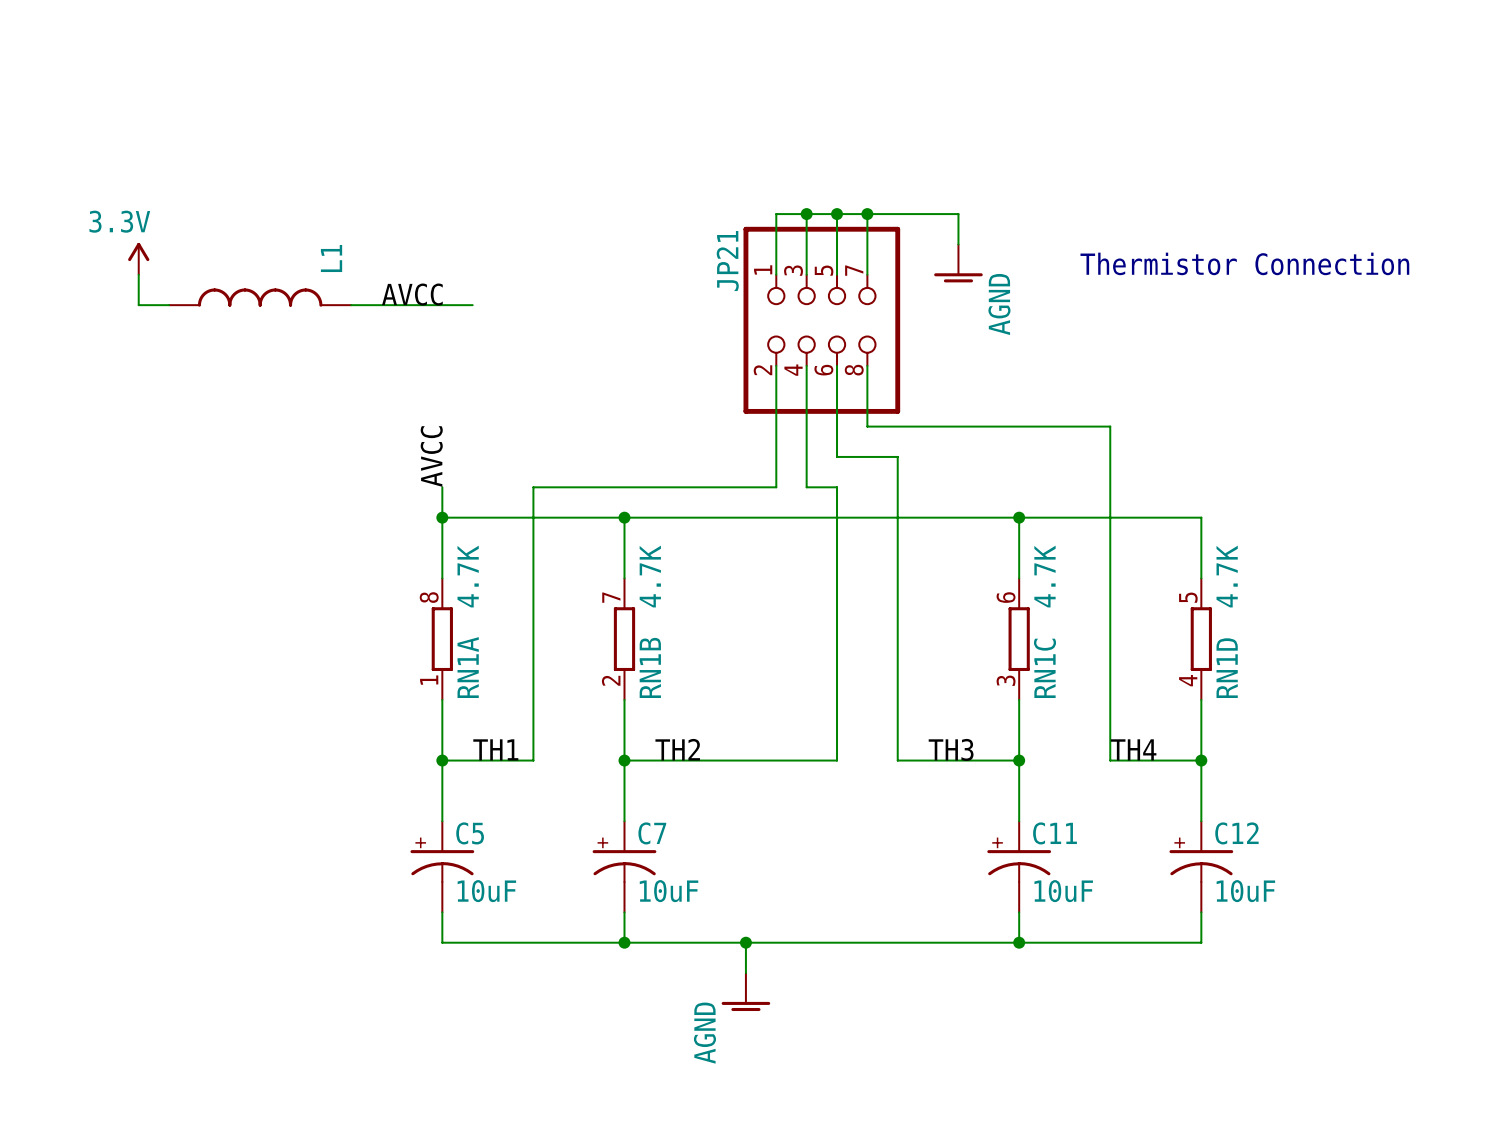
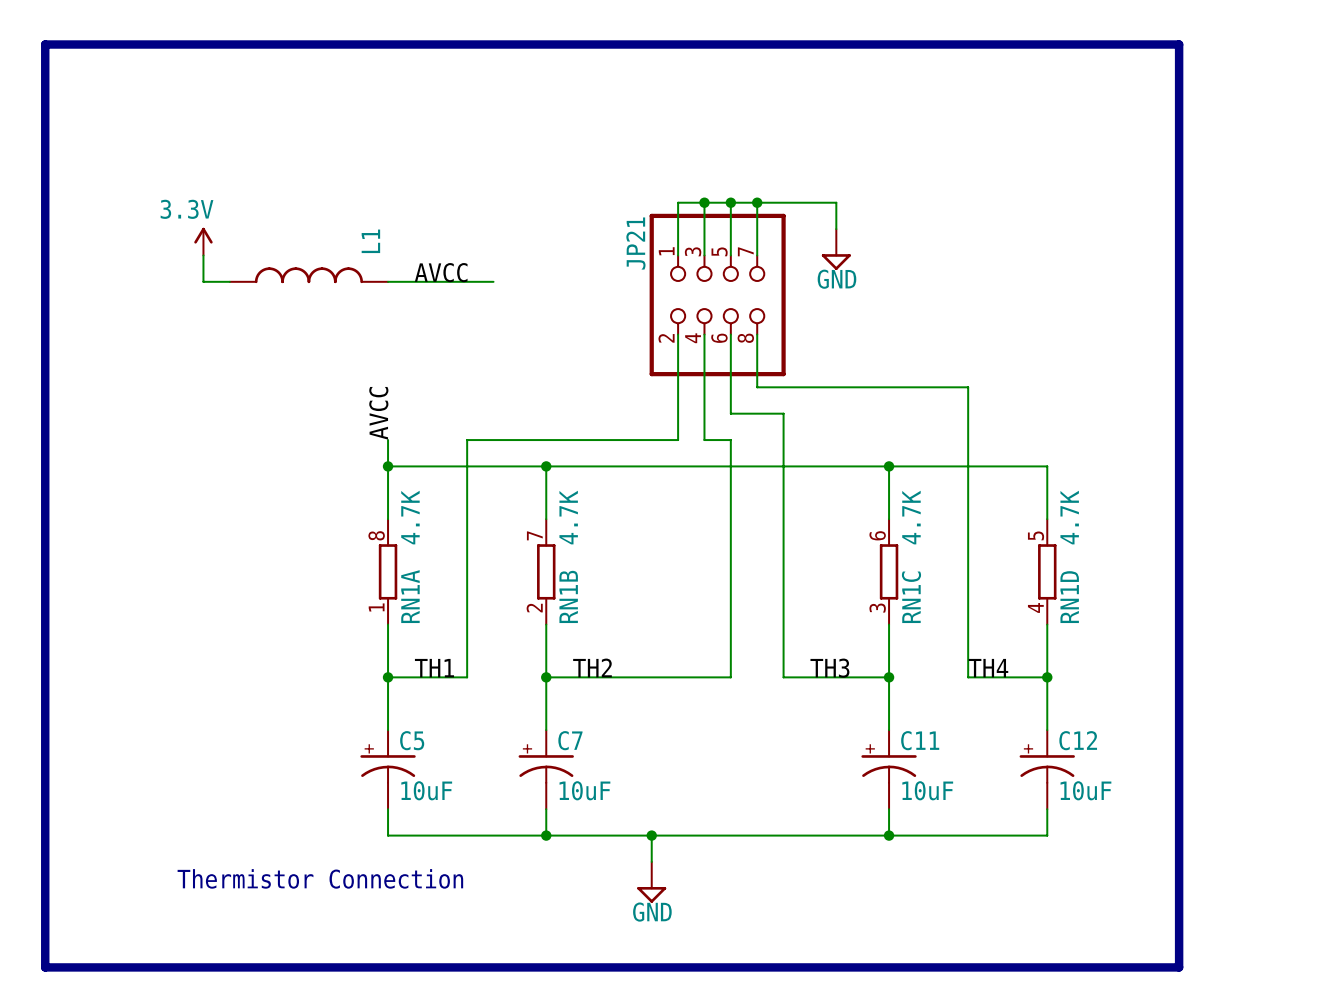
line: none -> (45, 44) (1179, 44) (1179, 967) (45, 967) (45, 44)
power symbol position: 3.3V (138, 258) -> 3.3V (203, 241)
power symbol: AGND (958, 263) -> GND (836, 249)
text: Thermistor Connection (1244, 263) -> none
wire: (138, 274) (138, 305) (169, 305) -> (203, 255) (203, 281) (229, 281)
label position: AVCC (412, 294) -> AVCC (441, 272)
L1 position: (260, 297) -> (308, 275)
wire: (351, 305) (442, 305) -> (414, 281) (493, 281)
text: none -> Thermistor Connection (320, 878)
power symbol: AGND (745, 992) -> GND (651, 882)

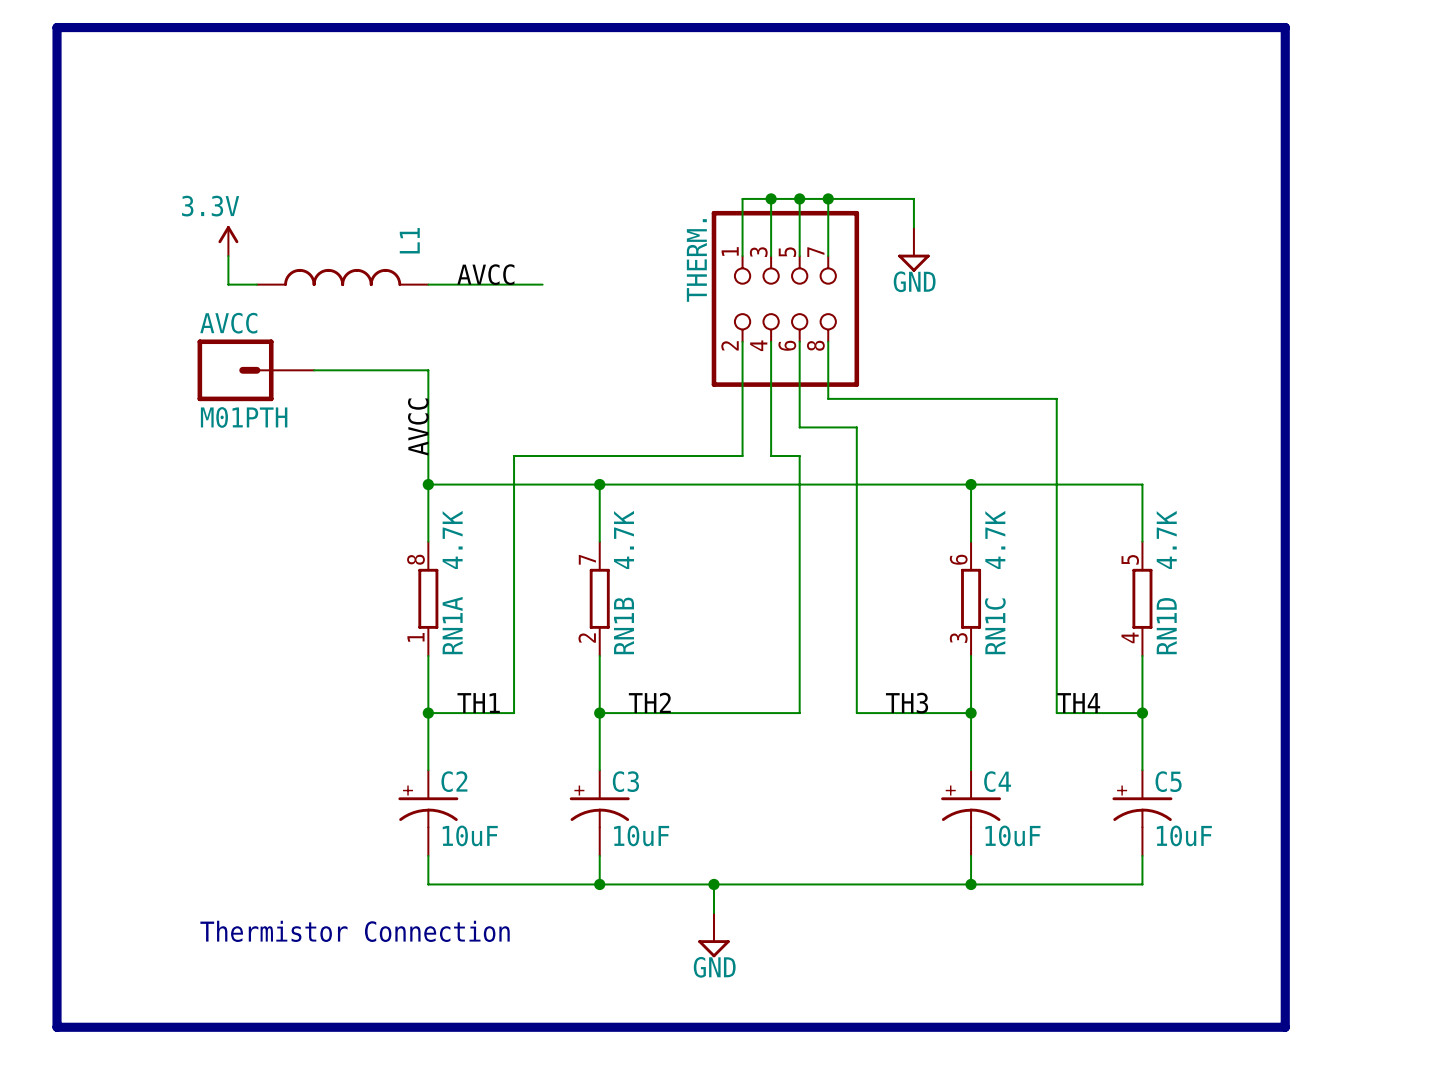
JP21 name: JP21 (635, 243) -> THERM. (696, 260)
AVCC: none -> M01PTH (255, 370)
wire: none -> (314, 370) (428, 370) (428, 456)
C5 name: C5 (412, 740) -> C2 (454, 781)
C7 name: C7 (570, 740) -> C3 (625, 781)
C11 name: C11 (920, 740) -> C4 (997, 781)
C12 name: C12 (1078, 740) -> C5 (1168, 781)

